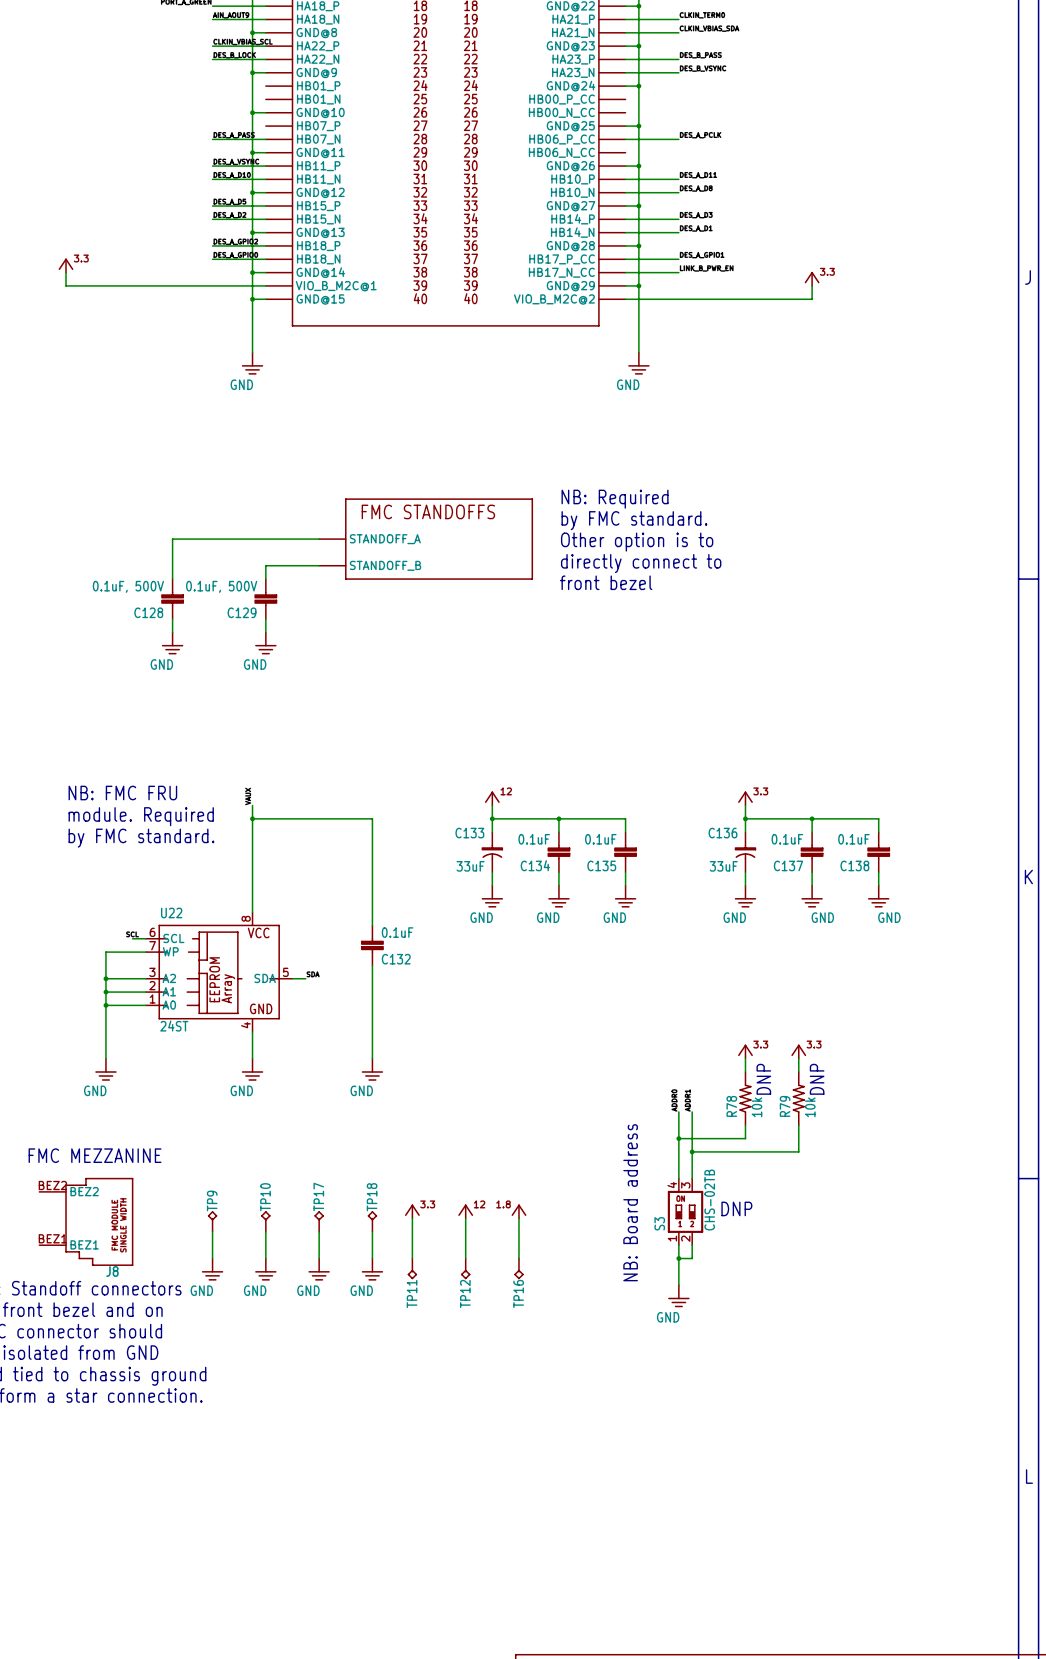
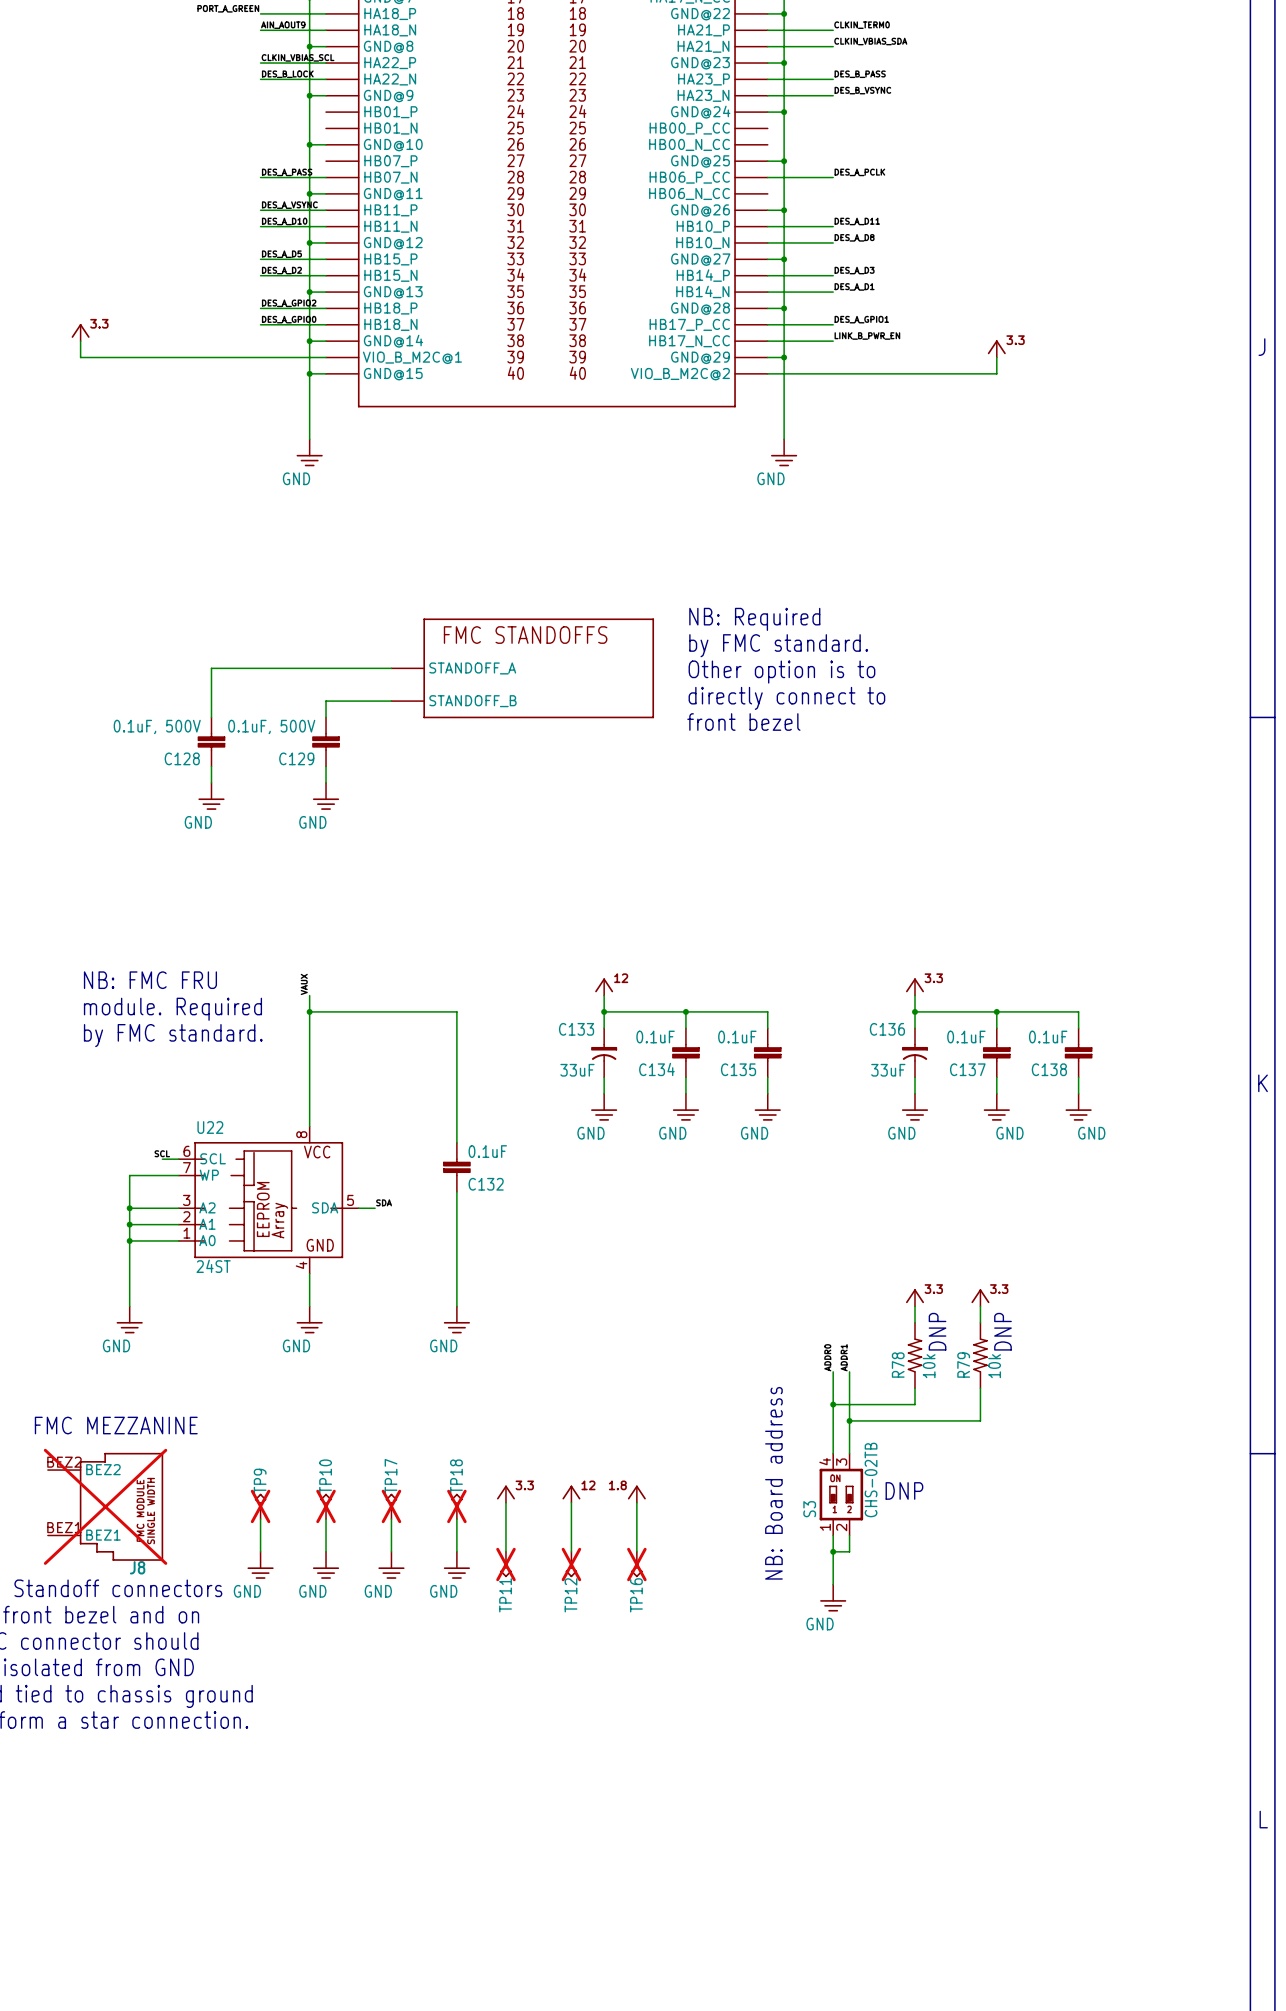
J8 do-not-place cross: none -> (105, 1506)
TP9 do-not-place cross: none -> (260, 1506)
TP10 do-not-place cross: none -> (326, 1506)
TP17 do-not-place cross: none -> (391, 1506)
TP18 do-not-place cross: none -> (456, 1506)
TP11 do-not-place cross: none -> (505, 1564)
TP12 do-not-place cross: none -> (571, 1564)
TP16 do-not-place cross: none -> (636, 1564)

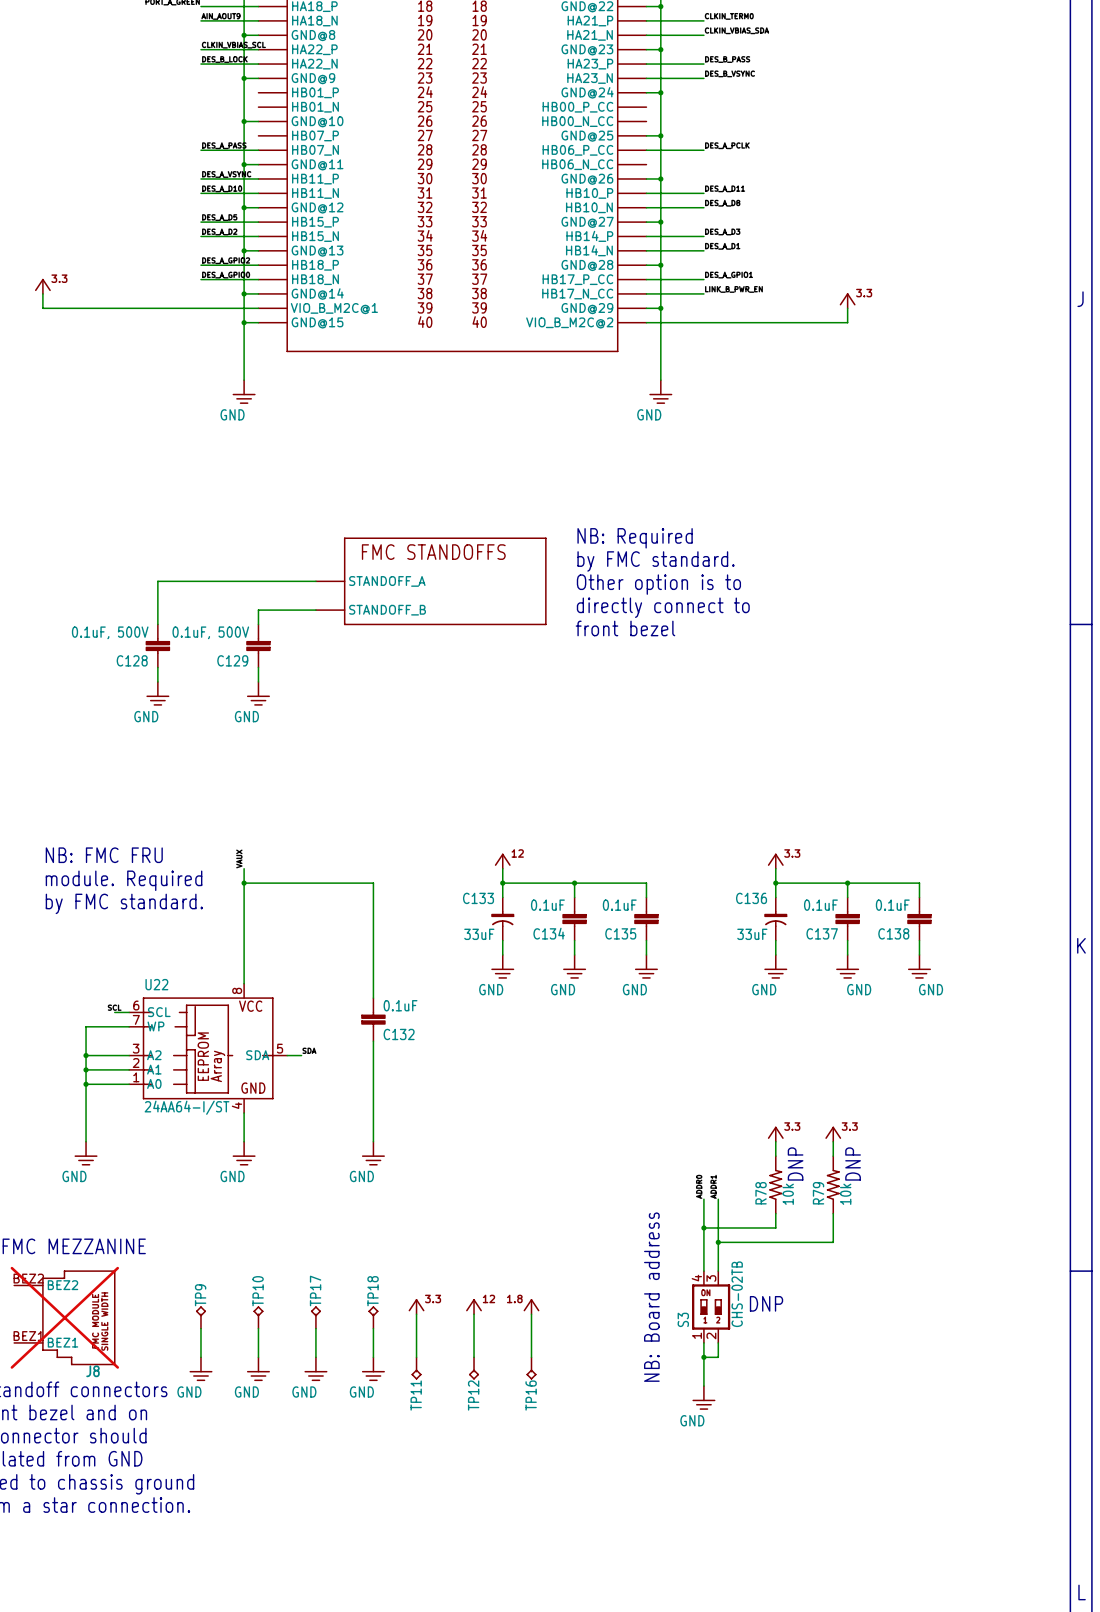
U22 value: 24ST (213, 1266) -> 24AA64-I/ST (187, 1107)
TP9 do-not-place cross: (260, 1506) -> none
TP10 do-not-place cross: (326, 1506) -> none
TP17 do-not-place cross: (391, 1506) -> none
TP18 do-not-place cross: (456, 1506) -> none
TP11 do-not-place cross: (505, 1564) -> none
TP12 do-not-place cross: (571, 1564) -> none
TP16 do-not-place cross: (636, 1564) -> none

